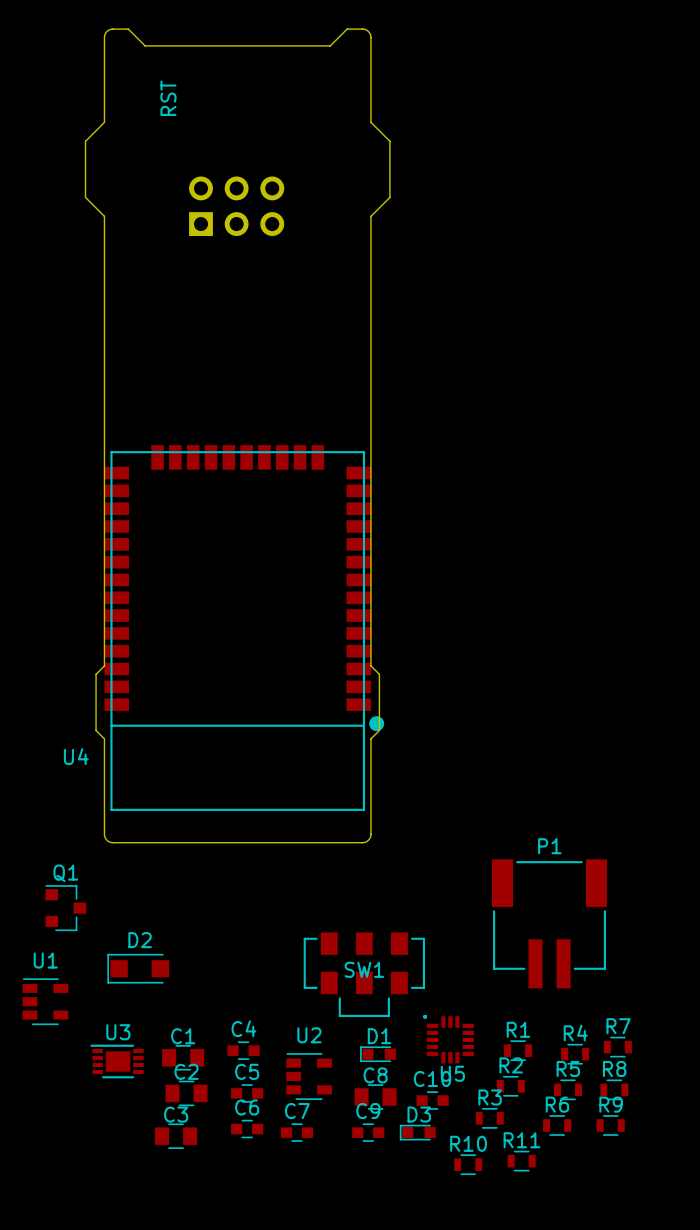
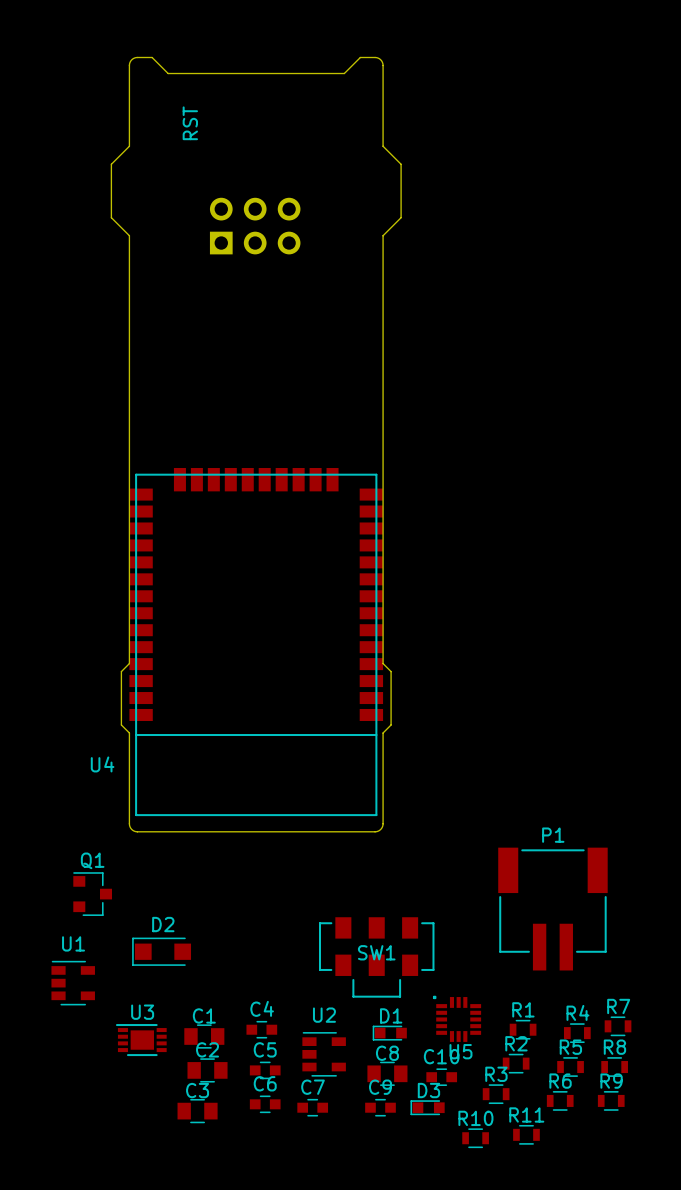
U4 footprint: [104, 445, 385, 811] -> [129, 468, 384, 817]

